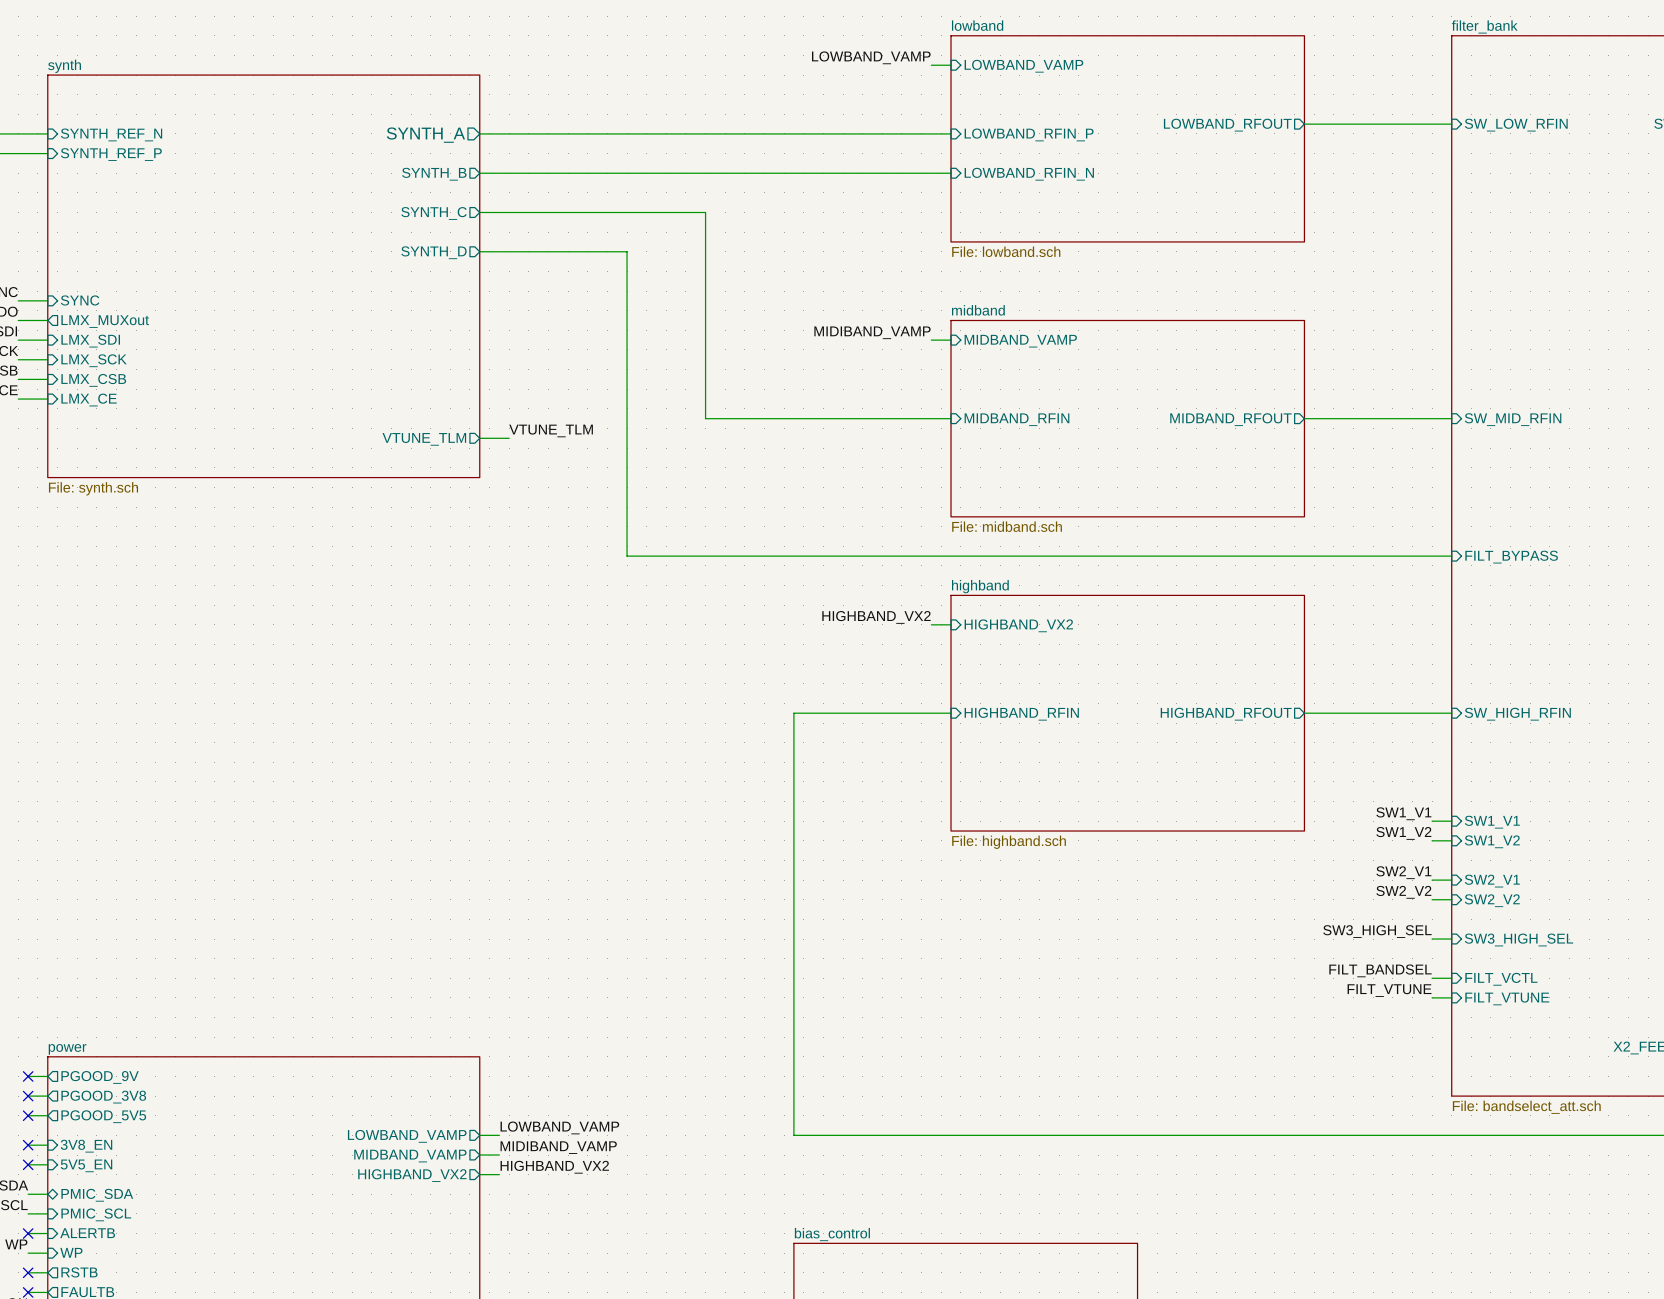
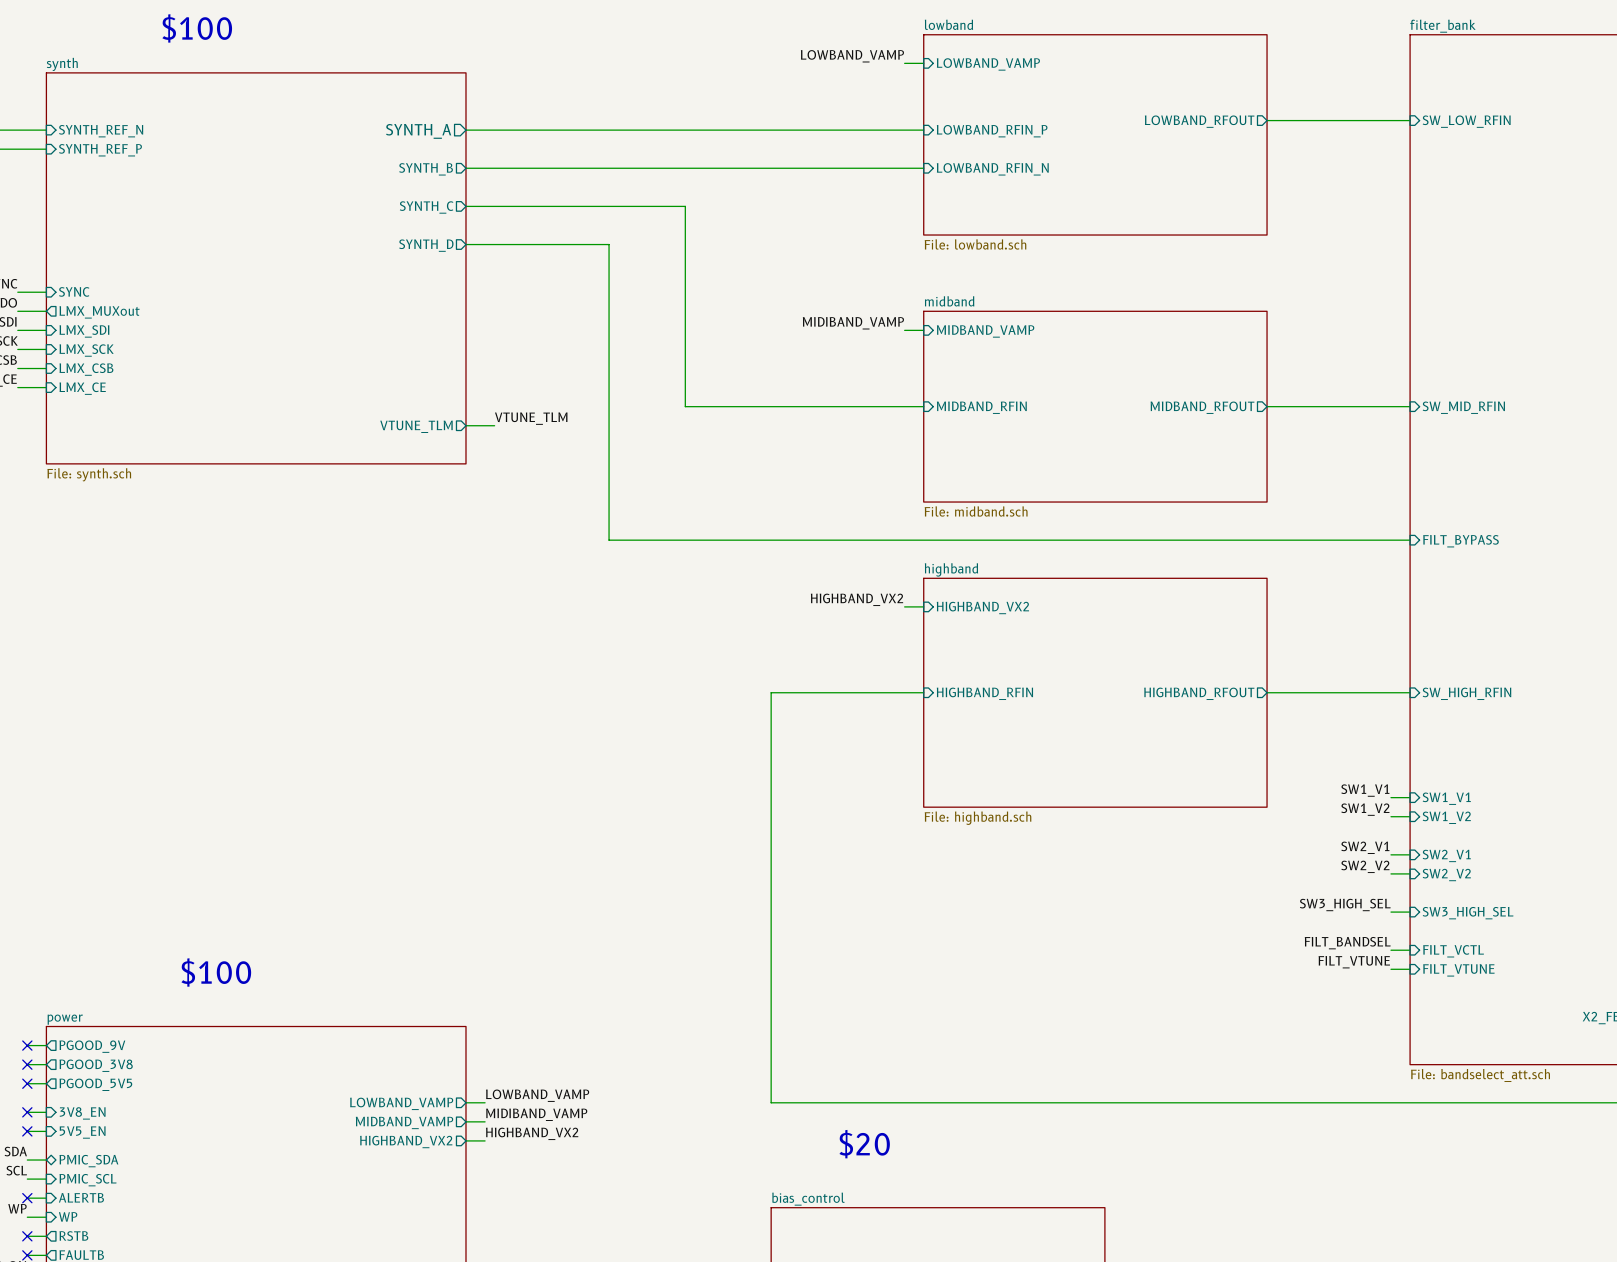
text: none -> $100 (197, 28)
text: none -> $100 (216, 972)
text: none -> $20 (864, 1144)

